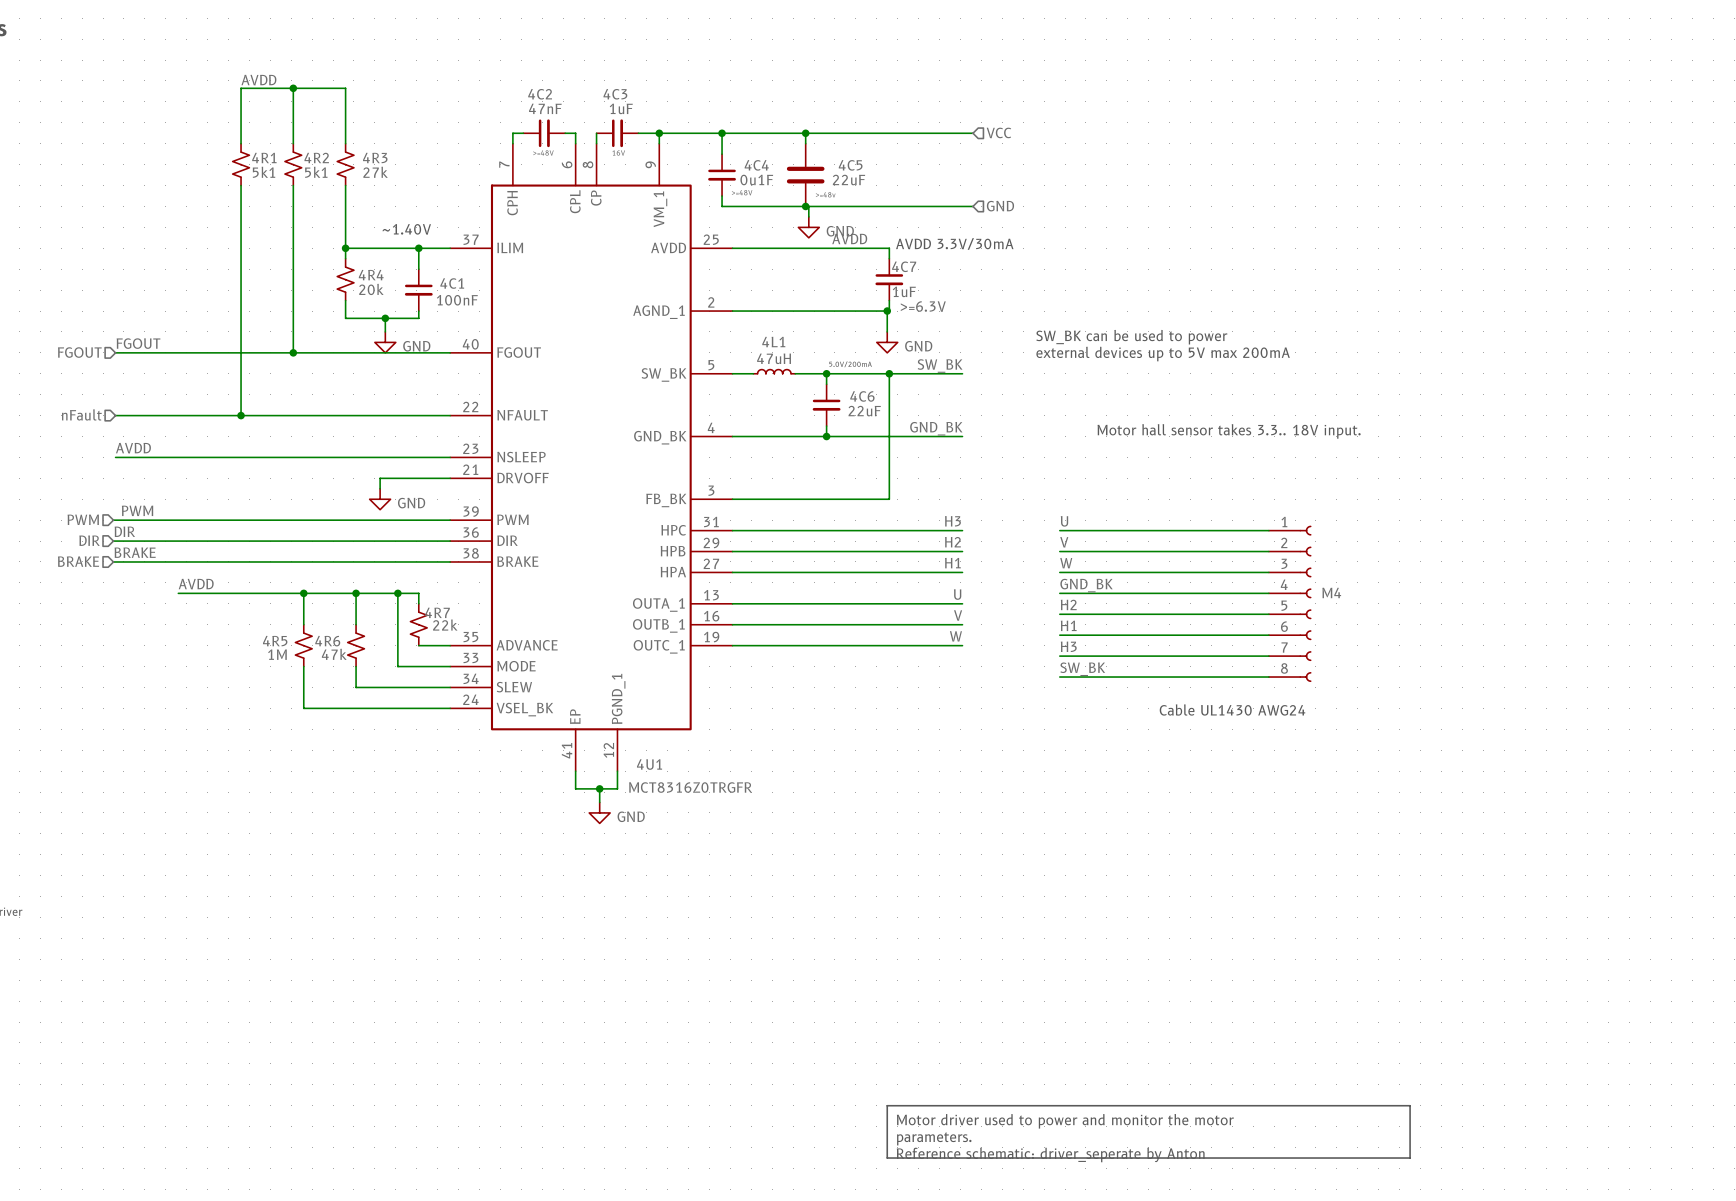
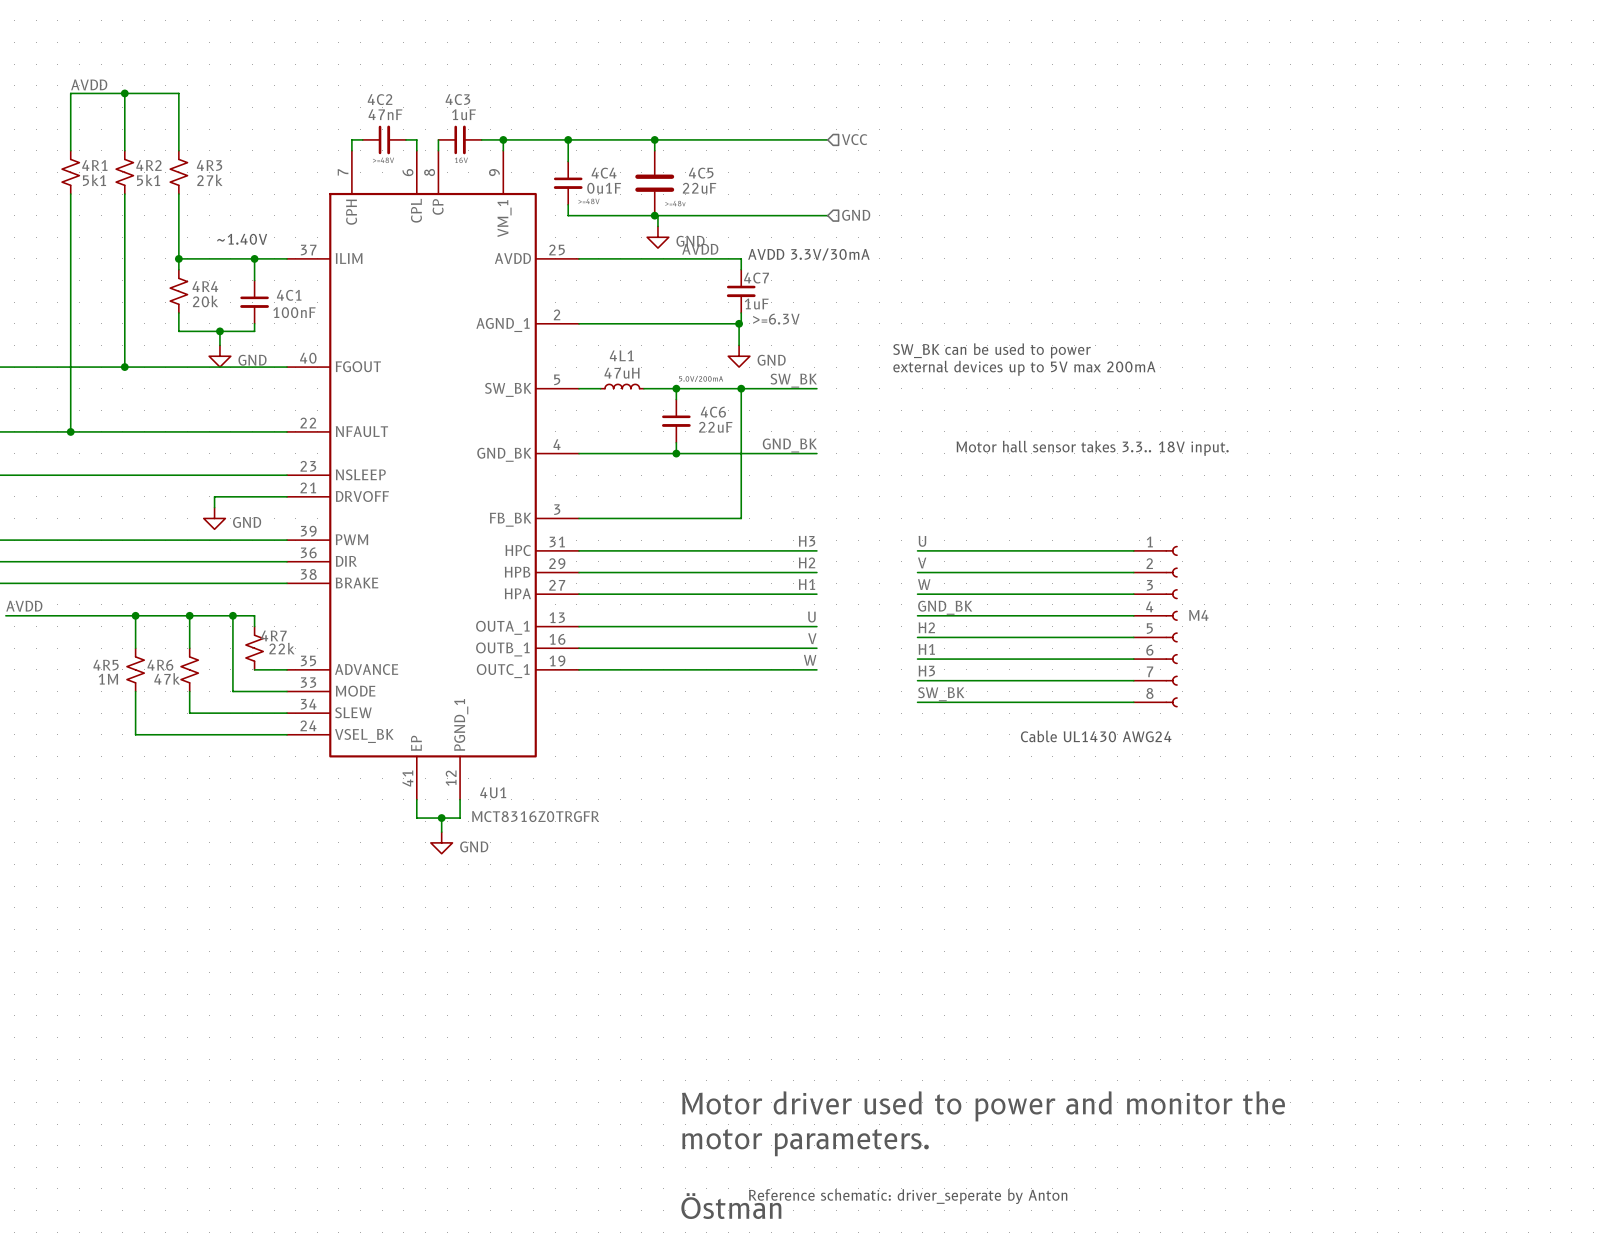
text: none -> Motor driver used to power and monitor the (983, 1106)
text: none -> motor parameters. (805, 1142)
line: (887, 1105) (1410, 1105) (1410, 1158) (887, 1158) (887, 1105) -> none
text: Motor driver used to power and monitor the motor (1065, 1121) -> none
text: parameters. (934, 1138) -> none
text: none -> Östman (731, 1206)

